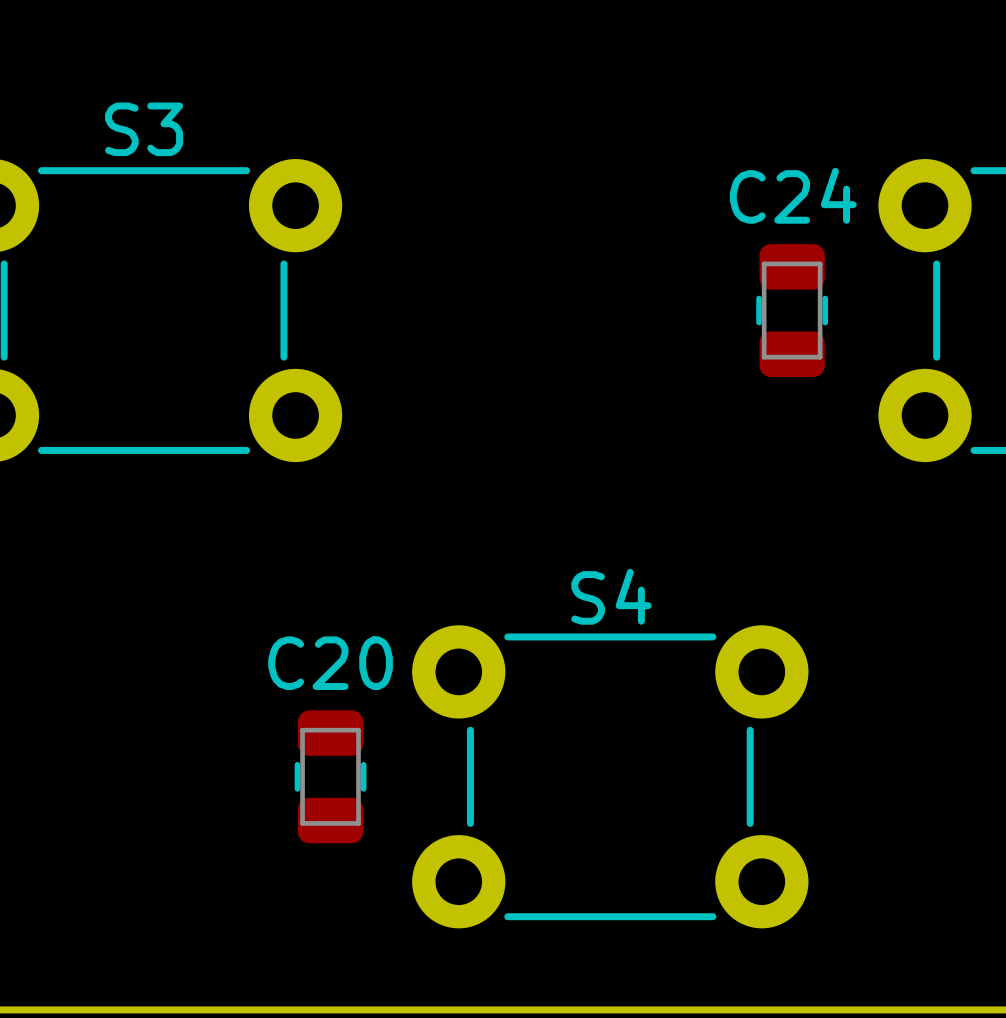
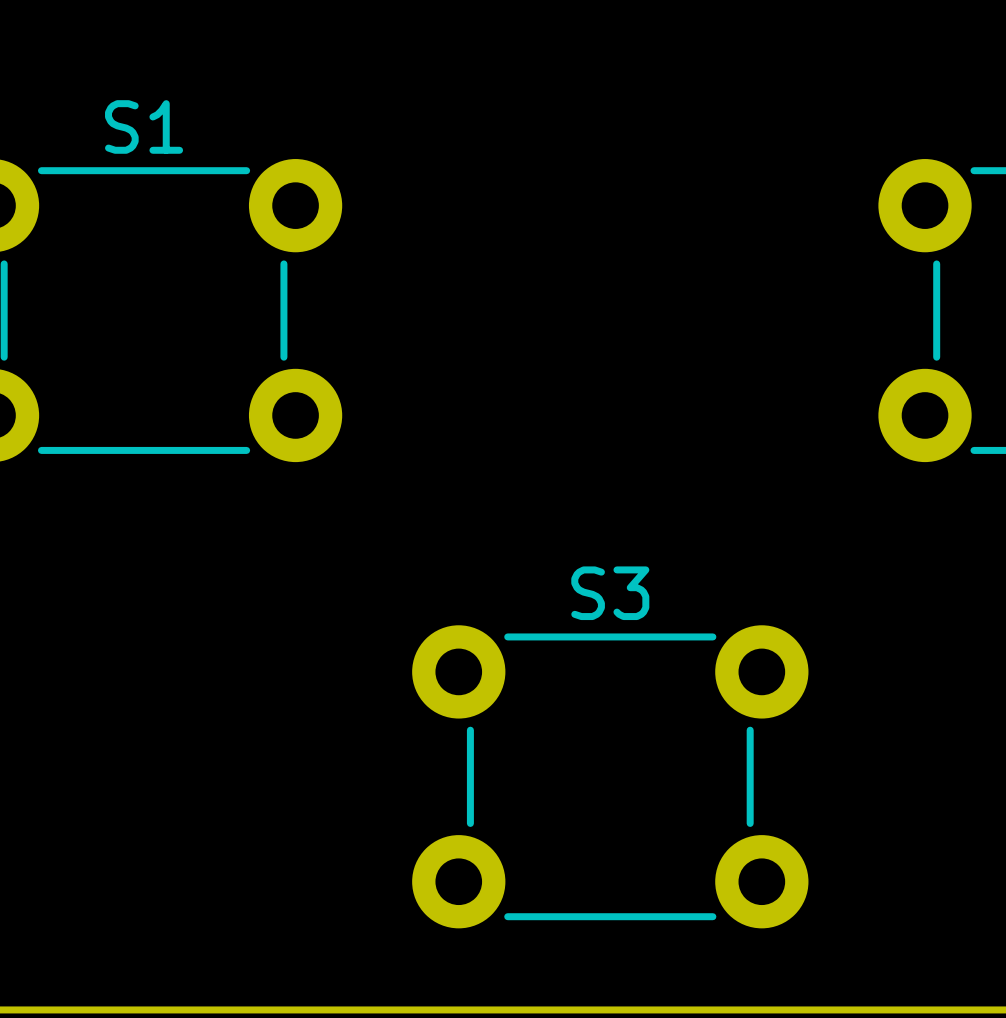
S3 name: S3 (144, 129) -> S1 (144, 126)
C24: (792, 310) -> none
S4 name: S4 (611, 596) -> S3 (610, 593)
C20: (330, 776) -> none

